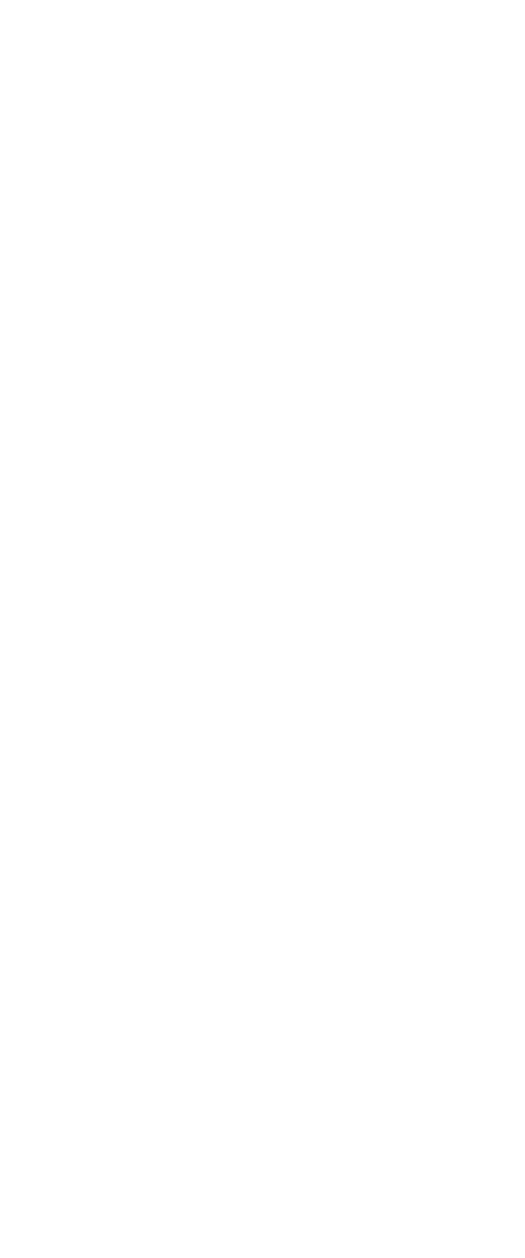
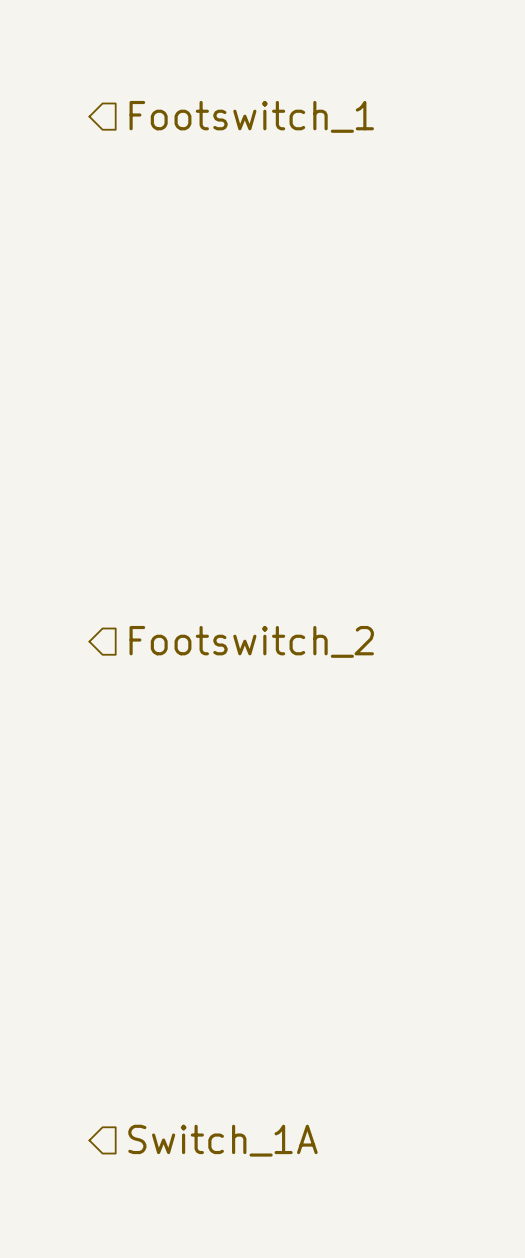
hierarchical label: none -> Footswitch_1 (251, 116)
hierarchical label: none -> Footswitch_2 (251, 641)
hierarchical label: none -> Switch_1A (222, 1140)

